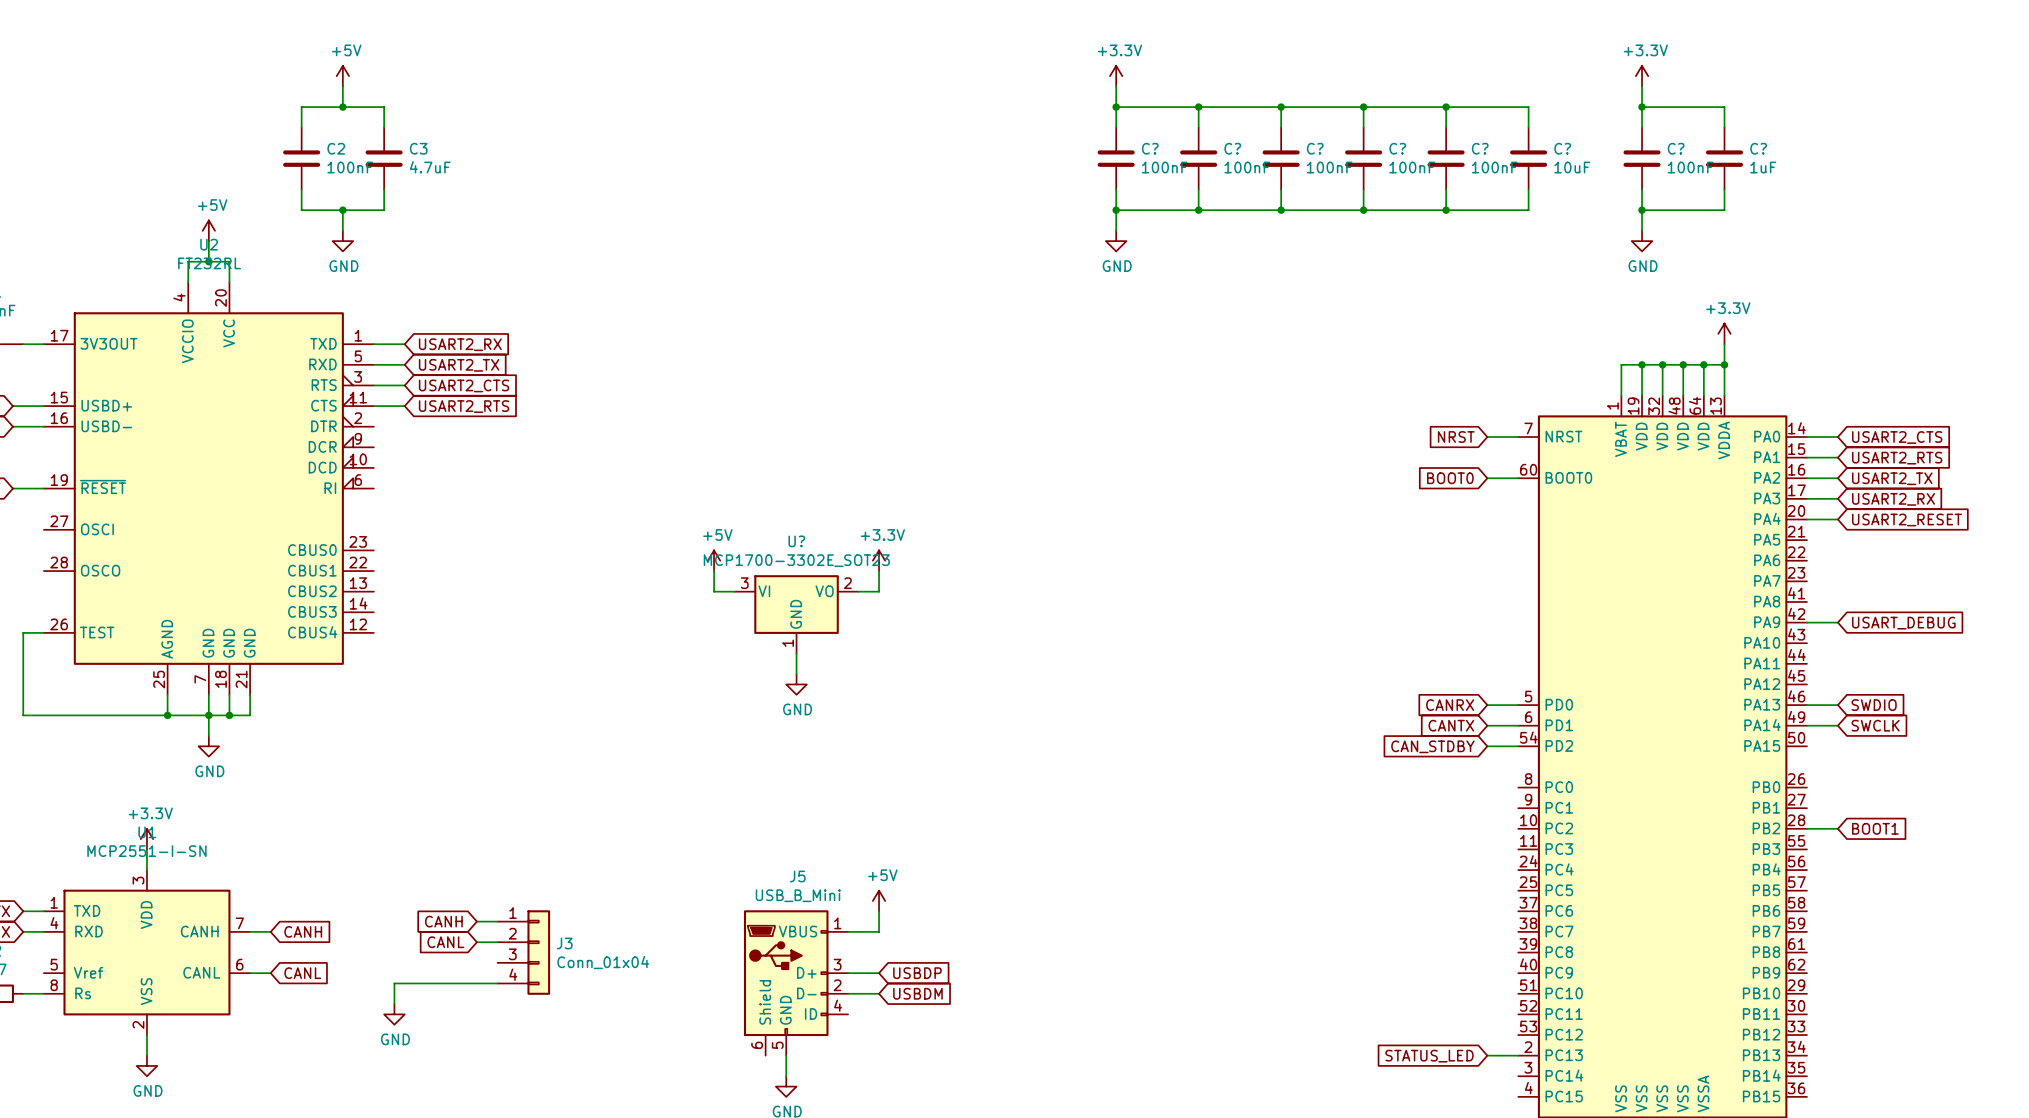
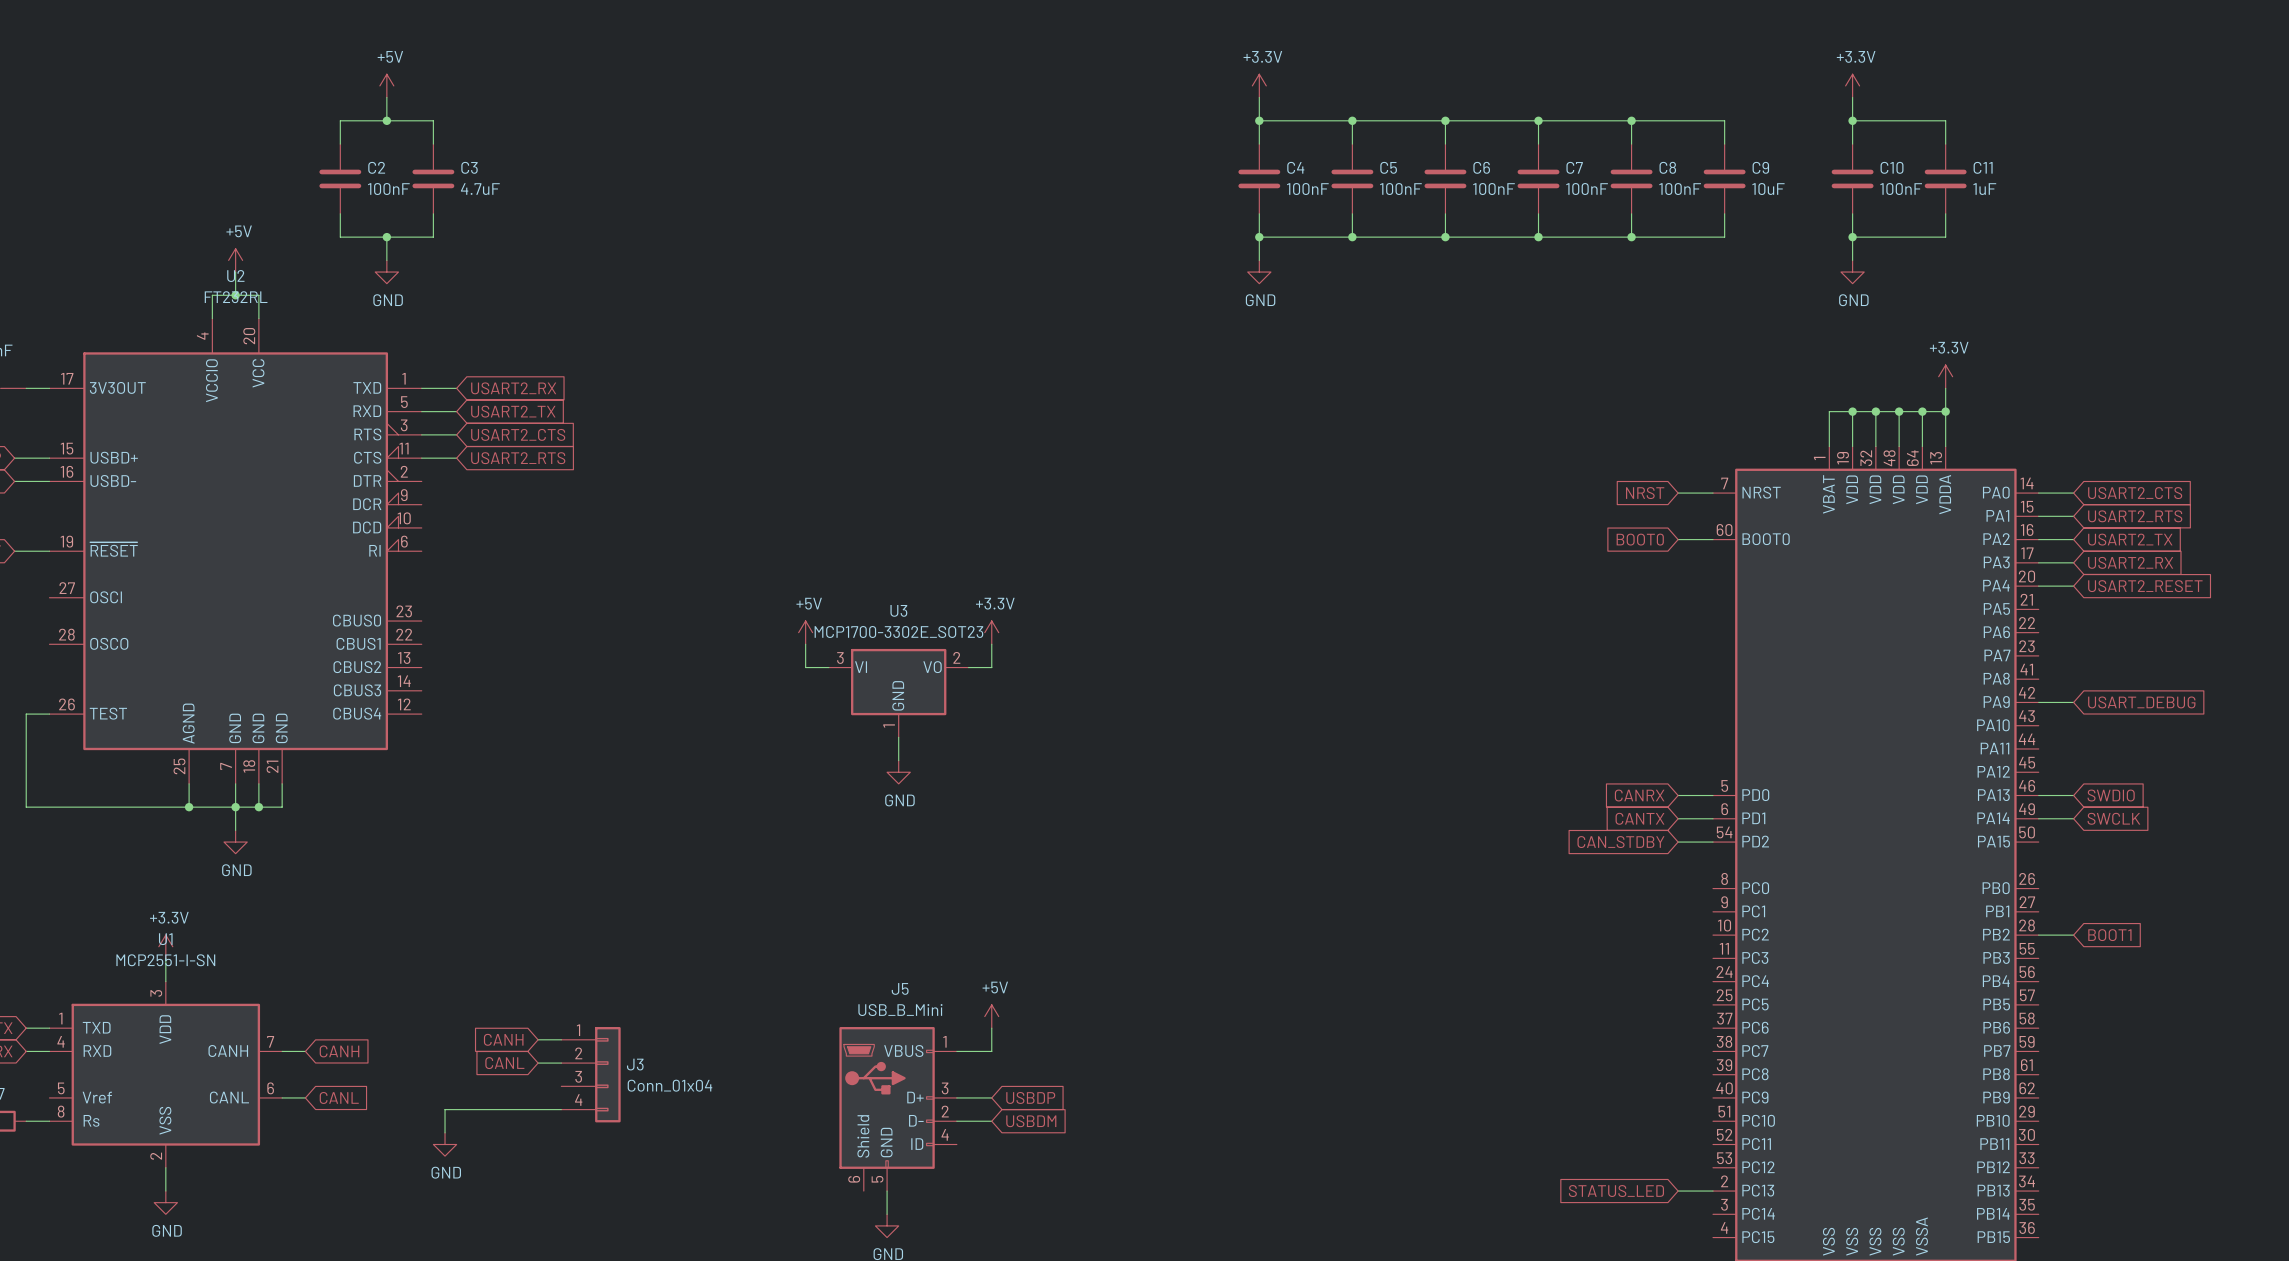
C? name: C? (1150, 148) -> C4 (1295, 167)
C? name: C? (1232, 148) -> C5 (1388, 167)
C? name: C? (1315, 148) -> C6 (1481, 167)
C? name: C? (1397, 148) -> C7 (1574, 167)
C? name: C? (1480, 148) -> C8 (1667, 167)
C? name: C? (1562, 148) -> C9 (1760, 167)
C? name: C? (1676, 148) -> C10 (1892, 167)
C? name: C? (1758, 148) -> C11 (1983, 167)
U? name: U? (796, 541) -> U3 (898, 610)

